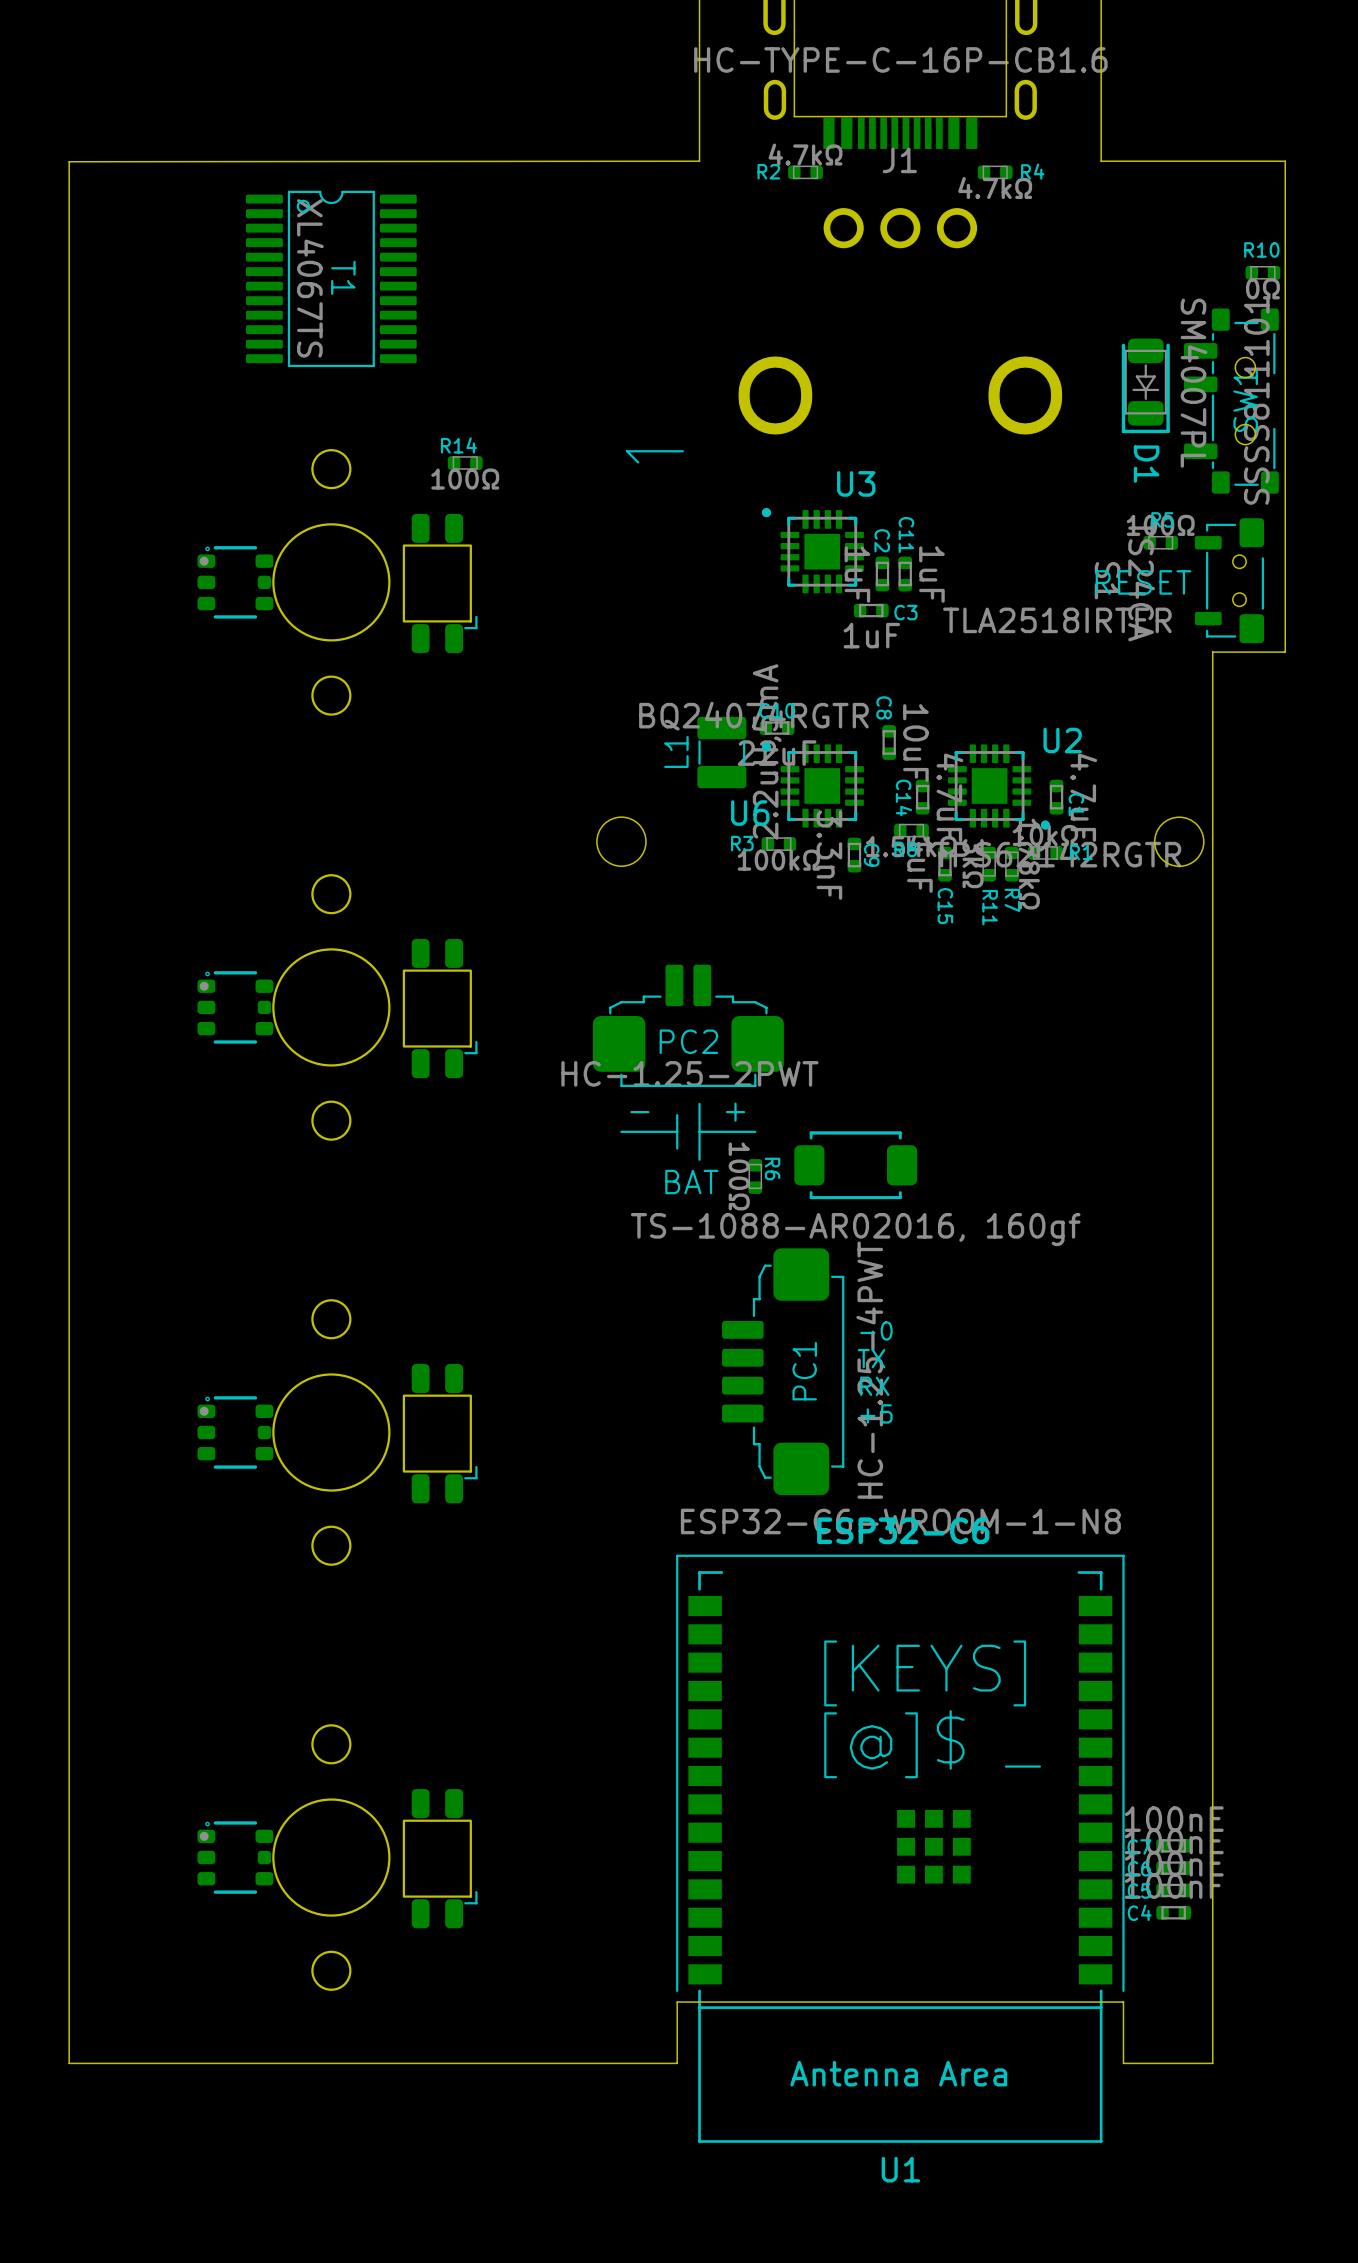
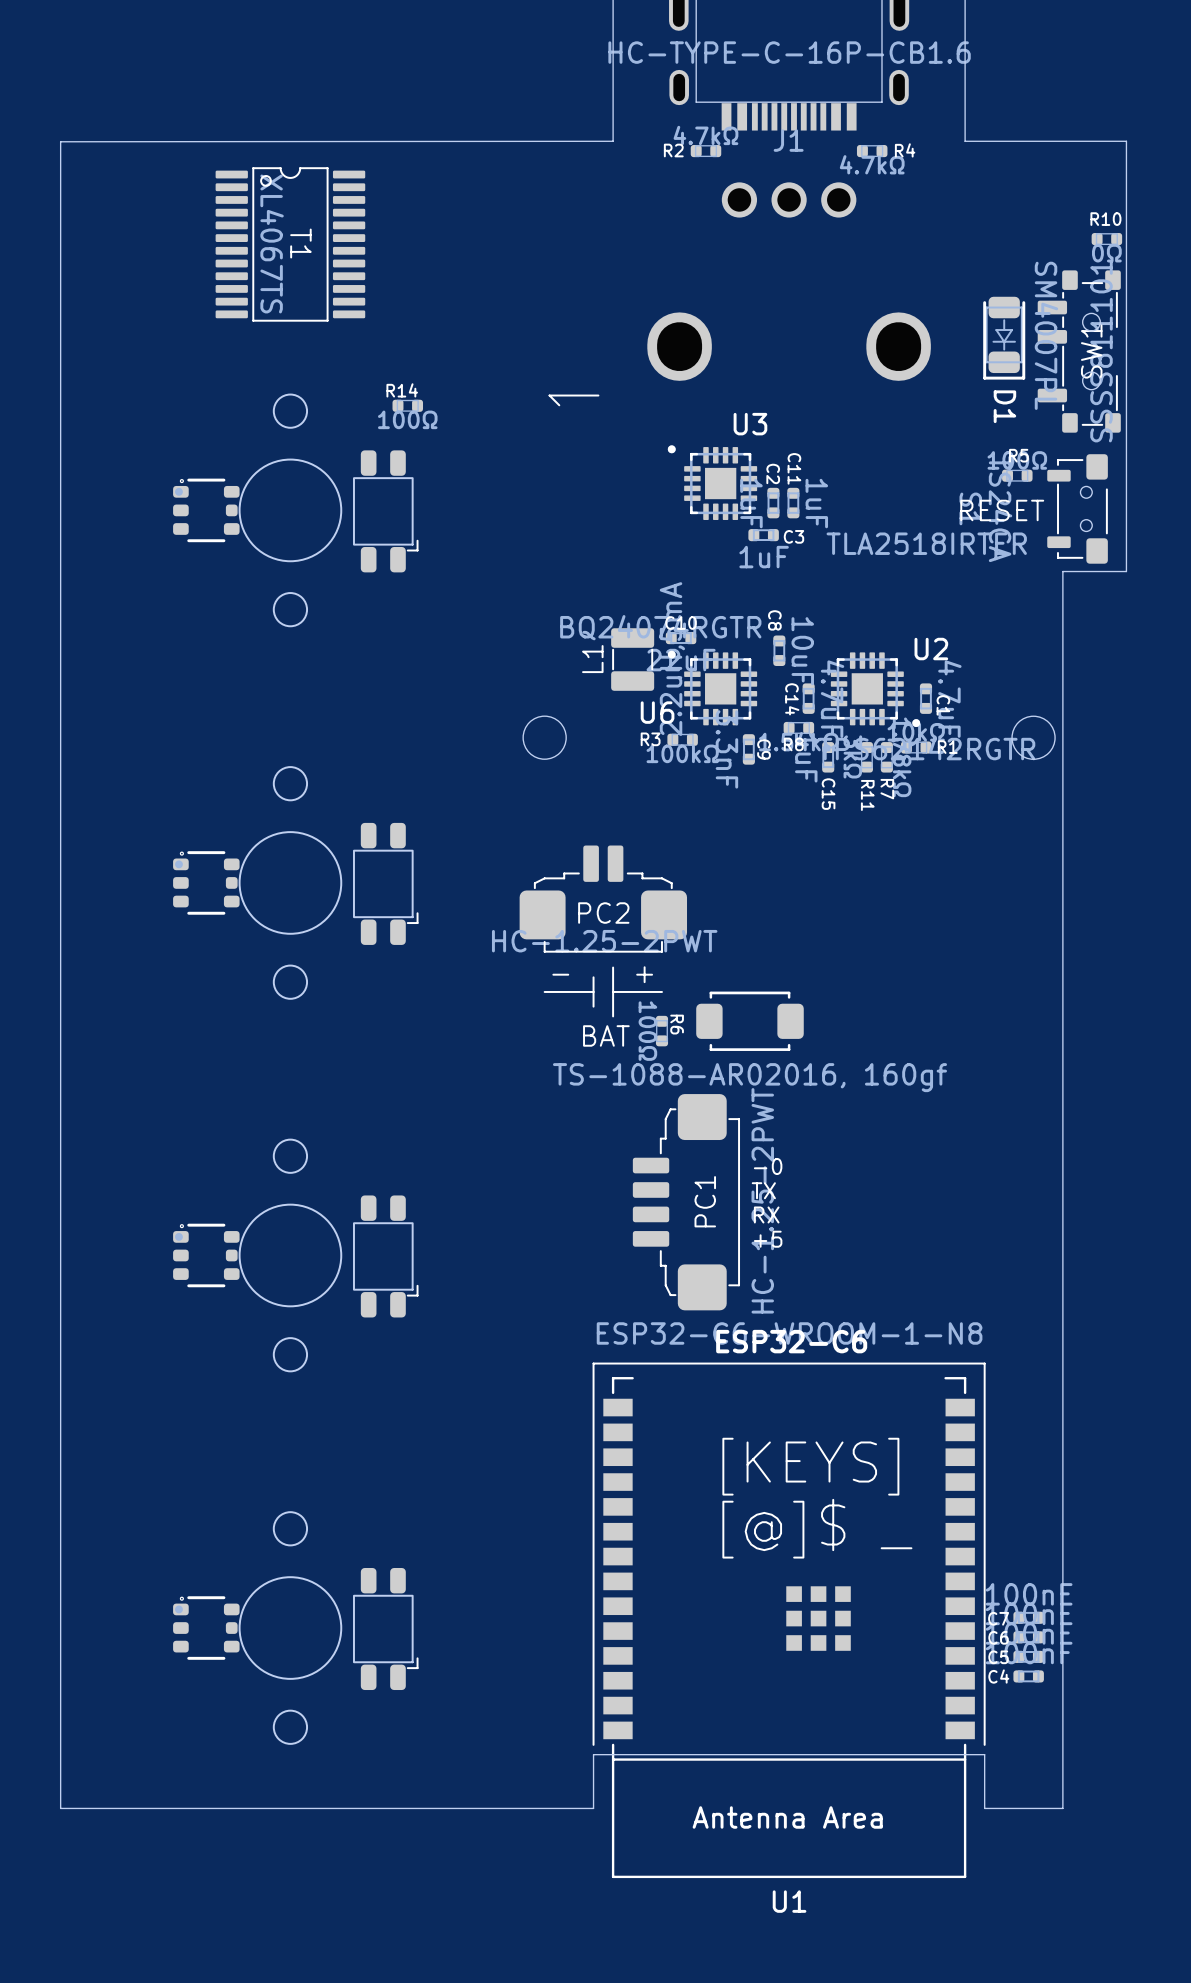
PC1 value: HC-1.25-4PWT (869, 1370) -> HC-1.25-2PWT (762, 1200)

